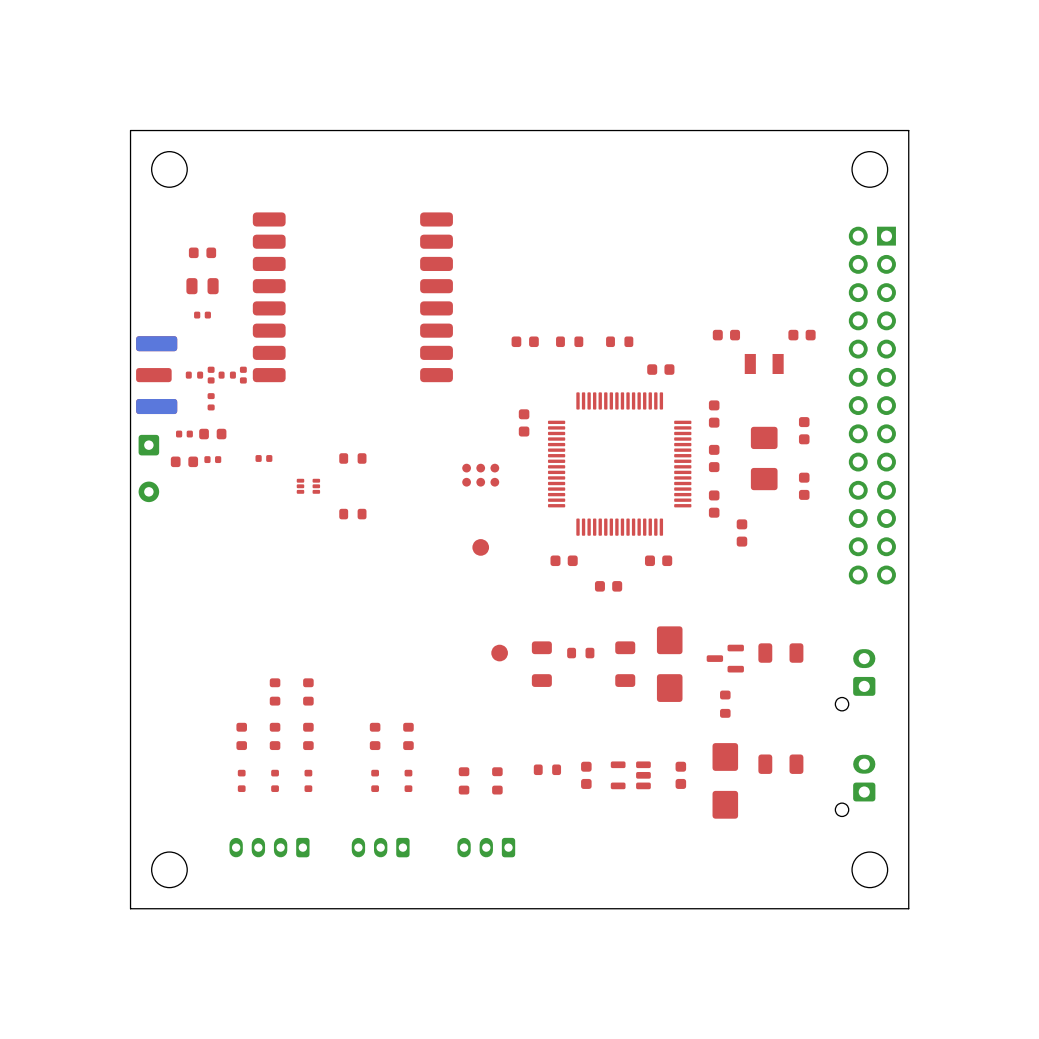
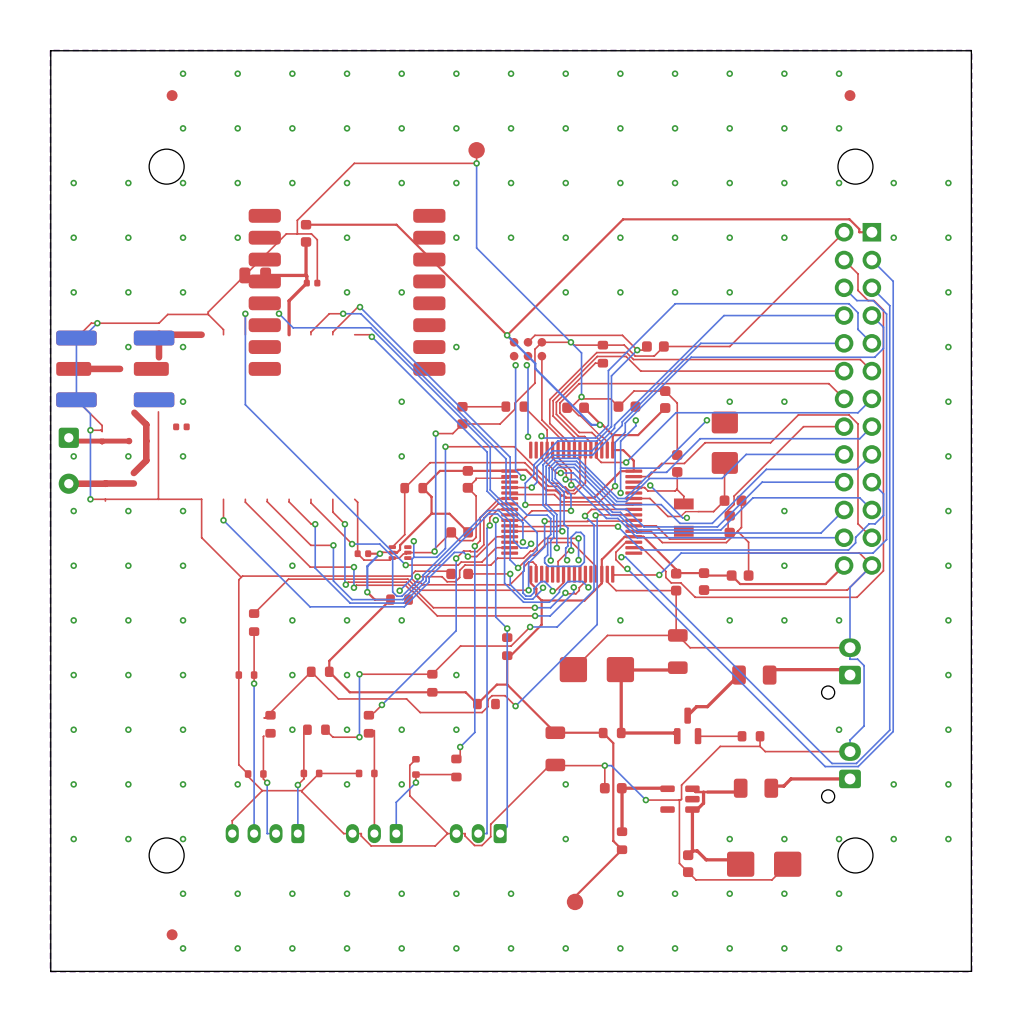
via: none -> (183, 73)
via: none -> (237, 73)
via: none -> (292, 73)
via: none -> (347, 73)
via: none -> (401, 73)
via: none -> (456, 73)
via: none -> (511, 73)
via: none -> (565, 73)
via: none -> (620, 73)
via: none -> (675, 73)
via: none -> (729, 73)
via: none -> (784, 73)
via: none -> (839, 73)
part: none -> (172, 95)
part: none -> (850, 95)
via: none -> (183, 128)
via: none -> (237, 128)
via: none -> (292, 128)
via: none -> (347, 128)
via: none -> (401, 128)
via: none -> (456, 128)
via: none -> (511, 128)
via: none -> (565, 128)
via: none -> (620, 128)
via: none -> (675, 128)
via: none -> (729, 128)
via: none -> (784, 128)
via: none -> (839, 128)
board edge: (908, 130) (130, 130) (130, 908) (908, 908) (908, 130) -> (971, 50) (971, 971) (50, 971) (50, 50) (971, 50)
top track: none -> (476, 150) (476, 163) (354, 163) (297, 220) (297, 233)
part: none -> (476, 150)
bottom track: none -> (476, 163) (476, 247) (581, 352) (581, 396)
via: none -> (476, 163)
via: none -> (73, 183)
via: none -> (128, 183)
via: none -> (183, 183)
via: none -> (237, 183)
via: none -> (292, 183)
via: none -> (347, 183)
via: none -> (401, 183)
via: none -> (456, 183)
via: none -> (511, 183)
via: none -> (565, 183)
via: none -> (620, 183)
via: none -> (675, 183)
via: none -> (729, 183)
via: none -> (784, 183)
via: none -> (839, 183)
via: none -> (893, 183)
via: none -> (948, 183)
top track: none -> (306, 224) (396, 224) (514, 342)
top track: none -> (844, 232) (729, 346) (663, 346) (654, 356) (635, 356) (624, 345) (573, 345) (570, 342) (541, 342) (534, 349) (534, 383) (514, 403) (514, 409) (500, 423) (462, 423) (452, 433) (435, 433)
top track: none -> (871, 232) (859, 232) (859, 229) (849, 219) (623, 219) (507, 335)
via: none -> (73, 237)
via: none -> (128, 237)
via: none -> (183, 237)
via: none -> (237, 237)
via: none -> (347, 237)
via: none -> (456, 237)
via: none -> (511, 237)
via: none -> (565, 237)
via: none -> (620, 237)
via: none -> (675, 237)
via: none -> (729, 237)
via: none -> (784, 237)
via: none -> (893, 237)
via: none -> (948, 237)
top track: none -> (306, 241) (306, 275)
part rotation: 0° (202, 252) -> 90° clockwise (306, 233)
part position: (202, 252) -> (306, 233)
top track: none -> (844, 260) (857, 273) (857, 290) (868, 300) (874, 300) (883, 310) (883, 570) (856, 597) (695, 597) (680, 582) (671, 582) (665, 577) (665, 571) (642, 547) (633, 547)
bottom track: none -> (871, 260) (893, 281) (893, 731) (858, 766) (825, 766) (627, 568)
top track: none -> (306, 275) (306, 283) (289, 300) (289, 334)
top track: none -> (306, 275) (265, 275)
part position: (202, 286) -> (255, 275)
part: none -> (312, 283)
top track: none -> (317, 283) (317, 239) (311, 233) (286, 233) (208, 311) (208, 314)
bottom track: none -> (844, 287) (856, 300) (873, 300) (886, 313) (886, 539) (873, 553) (681, 553) (659, 574)
bottom track: none -> (871, 287) (889, 305) (889, 730) (856, 763) (832, 763) (625, 557) (621, 557)
via: none -> (73, 292)
via: none -> (128, 292)
via: none -> (183, 292)
via: none -> (347, 292)
via: none -> (401, 292)
via: none -> (565, 292)
via: none -> (620, 292)
via: none -> (675, 292)
via: none -> (729, 292)
via: none -> (948, 292)
top track: none -> (360, 307) (332, 332) (332, 334)
bottom track: none -> (360, 307) (510, 457) (510, 498) (527, 515) (547, 515) (550, 518) (550, 534) (547, 537) (547, 555) (544, 558) (544, 562) (548, 566) (580, 566) (584, 562) (584, 535) (580, 532) (576, 532) (571, 537) (571, 550)
via: none -> (360, 307)
part: (202, 315) -> none
bottom track: none -> (279, 313) (293, 327) (370, 327) (490, 447) (490, 490) (522, 522) (522, 542)
via: none -> (279, 313)
top track: none -> (208, 314) (167, 314) (158, 323) (91, 323) (76, 338)
top track: none -> (208, 314) (223, 329) (223, 334)
bottom track: none -> (245, 313) (245, 404) (405, 565)
via: none -> (245, 313)
top track: none -> (343, 313) (329, 313) (310, 332) (310, 334)
bottom track: none -> (343, 313) (360, 313) (506, 458) (506, 501) (537, 532) (537, 549) (524, 563) (523, 593) (526, 596) (530, 596) (534, 592) (534, 588) (541, 581) (544, 581) (552, 591)
via: none -> (343, 313)
bottom track: none -> (844, 315) (724, 315) (614, 425) (614, 428) (591, 450) (552, 450) (536, 466) (536, 482) (531, 487)
bottom track: none -> (871, 315) (883, 327) (883, 348) (874, 357) (691, 357) (625, 423) (625, 432) (615, 442) (615, 486)
bottom track: none -> (97, 323) (82, 338) (76, 338) (76, 399) (90, 413) (90, 499)
via: none -> (97, 323)
part: (726, 335) -> none
part: (802, 335) -> none
top track: none -> (160, 334) (158, 357)
top track: none -> (201, 334) (160, 334)
top track: none -> (354, 334) (369, 334) (371, 336)
bottom track: none -> (507, 335) (535, 363) (535, 368) (591, 424) (599, 424)
via: none -> (507, 335)
part rotation: 0° (525, 341) -> 90° clockwise (462, 415)
part position: (525, 341) -> (462, 415)
part: (569, 341) -> none
part rotation: 0° (619, 341) -> 90° clockwise (602, 354)
part position: (619, 341) -> (602, 354)
bottom track: none -> (371, 336) (487, 452) (487, 491) (513, 517) (513, 541) (520, 548) (526, 548) (531, 543)
via: none -> (371, 336)
top track: none -> (528, 342) (534, 335) (622, 335) (637, 350) (643, 350) (646, 346)
via: none -> (570, 342)
bottom track: none -> (844, 343) (700, 343) (622, 421) (622, 425) (592, 455) (552, 455) (543, 464) (543, 505) (553, 515) (550, 560)
bottom track: none -> (871, 343) (857, 329) (857, 312) (848, 303) (675, 303) (608, 370) (608, 425) (595, 438) (543, 438) (541, 436)
via: none -> (128, 347)
via: none -> (183, 347)
via: none -> (456, 347)
via: none -> (948, 347)
bottom track: none -> (637, 350) (611, 375) (611, 426) (597, 441) (557, 441) (533, 464) (533, 474) (525, 483) (525, 504)
via: none -> (637, 350)
top track: none -> (541, 356) (541, 419) (563, 441) (563, 450)
part rotation: 0° (764, 363) -> 90° clockwise (683, 517)
part position: (764, 363) -> (683, 517)
top track: none -> (602, 363) (595, 363) (556, 402) (556, 414) (578, 436) (584, 436) (590, 442) (590, 450)
part position: (660, 369) -> (655, 346)
bottom track: none -> (515, 365) (515, 470) (522, 477)
via: none -> (515, 365)
bottom track: none -> (526, 365) (528, 436)
via: none -> (526, 365)
part: none -> (76, 368)
top track: none -> (120, 368) (73, 368)
part: (194, 375) -> none
part: (211, 375) -> none
part: (227, 375) -> none
part: (243, 375) -> none
top track: none -> (844, 371) (640, 371) (626, 356) (597, 356) (553, 400) (553, 416) (574, 437) (574, 450)
top track: none -> (871, 371) (860, 359) (633, 359) (626, 352) (596, 352) (549, 399) (549, 423) (569, 442) (569, 450)
part: (211, 401) -> none
via: none -> (581, 396)
top track: none -> (844, 398) (828, 383) (579, 383) (559, 403) (559, 413) (579, 432) (591, 432) (601, 442) (601, 450)
bottom track: none -> (871, 398) (857, 412) (675, 412) (626, 462)
top track: none -> (76, 399) (102, 425) (102, 431) (90, 430)
part: none -> (665, 399)
via: none -> (183, 401)
via: none -> (401, 401)
via: none -> (729, 401)
via: none -> (784, 401)
via: none -> (948, 401)
part footprint: [518, 409, 530, 437] -> [501, 401, 529, 412]
top track: none -> (505, 406) (462, 406)
top track: none -> (523, 406) (547, 429) (547, 450)
part: none -> (626, 406)
top track: none -> (570, 407) (607, 441) (607, 450)
top track: none -> (570, 407) (579, 398) (610, 398) (618, 406) (634, 391) (665, 391) (677, 403) (677, 455)
part: none -> (575, 407)
top track: none -> (584, 407) (612, 435)
top track: none -> (665, 408) (638, 435) (612, 435)
part: (714, 414) -> none
top track: none -> (158, 411) (158, 499)
top track: none -> (134, 412) (146, 424) (146, 460) (133, 473)
bottom track: none -> (635, 420) (635, 426) (620, 441) (620, 492)
via: none -> (635, 420)
bottom track: none -> (706, 420) (659, 468) (620, 468)
via: none -> (706, 420)
part: (804, 430) -> none
via: none -> (599, 424)
top track: none -> (844, 426) (803, 426) (734, 496) (734, 504) (728, 510) (728, 535) (724, 539) (669, 539) (656, 525) (633, 525)
bottom track: none -> (871, 426) (859, 438) (700, 438) (666, 472) (651, 472) (625, 498) (617, 498) (577, 458) (554, 458) (546, 466) (546, 503) (556, 514) (556, 548)
part: (212, 434) -> none
via: none -> (90, 430)
bottom track: none -> (435, 433) (434, 551)
via: none -> (435, 433)
top track: none -> (612, 435) (612, 450) (623, 450) (633, 460) (633, 471) (620, 471) (594, 497) (566, 497) (556, 490) (546, 490) (526, 469) (439, 470) (422, 488) (431, 496) (431, 513)
via: none -> (541, 436)
via: none -> (528, 436)
top track: none -> (68, 437) (68, 441) (129, 441)
top track: none -> (445, 446) (514, 446) (550, 483) (559, 483) (568, 490) (573, 490) (579, 484) (579, 450)
bottom track: none -> (445, 446) (445, 548) (436, 557) (413, 557)
via: none -> (445, 446)
top track: none -> (541, 450) (541, 457) (556, 473) (560, 473)
top track: none -> (552, 450) (552, 458) (566, 470) (565, 479)
top track: none -> (558, 450) (558, 457) (571, 470) (571, 485)
top track: none -> (585, 450) (585, 483) (574, 493) (567, 493) (557, 486) (548, 486) (524, 462) (430, 462) (404, 488) (404, 534) (392, 547)
top track: none -> (596, 450) (596, 457) (601, 462) (626, 462)
part: (263, 458) -> none
part: (352, 458) -> none
part: (714, 458) -> none
part position: (764, 458) -> (724, 442)
part: (212, 459) -> none
part: (184, 461) -> none
bottom track: none -> (844, 454) (746, 454) (722, 478) (649, 478) (626, 501) (616, 501) (576, 461) (555, 461) (549, 467) (549, 481) (560, 492) (560, 529) (562, 531)
bottom track: none -> (871, 454) (856, 469) (766, 469) (712, 523) (679, 523) (661, 504) (615, 504) (575, 464) (557, 464) (552, 469) (552, 480) (564, 492) (564, 524) (567, 528) (567, 546) (565, 548) (567, 560)
via: none -> (73, 456)
via: none -> (128, 456)
via: none -> (183, 456)
via: none -> (401, 456)
part position: (619, 464) -> (571, 512)
via: none -> (948, 456)
part position: (148, 468) -> (68, 460)
via: none -> (626, 462)
top track: none -> (724, 462) (724, 500) (713, 511) (685, 511) (680, 516) (667, 516) (649, 498) (633, 498)
part: none -> (677, 463)
part position: (480, 475) -> (528, 349)
top track: none -> (677, 471) (676, 489)
bottom track: none -> (560, 473) (573, 473) (612, 512) (620, 512) (638, 529) (720, 529) (752, 497) (859, 497) (871, 509)
via: none -> (560, 473)
top track: none -> (509, 476) (508, 478) (476, 478) (467, 487) (476, 496) (476, 537) (472, 540) (459, 540) (451, 532) (434, 548) (433, 552) (407, 552) (399, 558) (392, 558) (390, 560) (364, 560) (357, 553) (357, 502) (354, 499)
top track: none -> (633, 476) (648, 476) (661, 463) (684, 463) (705, 442) (770, 442) (798, 414) (849, 414) (857, 423) (857, 523) (871, 537)
via: none -> (522, 477)
part position: (308, 486) -> (400, 552)
part: (804, 486) -> none
part: none -> (467, 479)
bottom track: none -> (565, 479) (575, 479) (611, 515) (619, 515) (636, 533) (821, 533) (844, 509)
via: none -> (565, 479)
bottom track: none -> (844, 482) (762, 482) (717, 526) (644, 526) (626, 509) (615, 509) (573, 467) (558, 467) (555, 470) (555, 478) (570, 494) (570, 510)
bottom track: none -> (871, 482) (883, 493) (883, 515) (875, 523) (869, 523) (855, 537) (855, 542) (848, 550) (641, 550) (617, 526)
top track: none -> (133, 483) (68, 483)
bottom track: none -> (571, 485) (606, 518) (617, 518) (637, 537) (844, 537)
via: none -> (571, 485)
bottom track: none -> (650, 485) (682, 517) (686, 517)
via: none -> (650, 485)
top track: none -> (615, 486) (599, 501) (561, 501) (554, 494) (509, 493)
via: none -> (615, 486)
top track: none -> (531, 487) (509, 487)
via: none -> (531, 487)
top track: none -> (633, 487) (644, 487) (647, 490) (675, 490) (676, 489)
part: none -> (413, 488)
top track: none -> (676, 489) (683, 496) (683, 503)
via: none -> (620, 492)
part: (714, 504) -> none
top track: none -> (509, 498) (499, 498) (480, 517) (480, 540) (474, 546)
top track: none -> (90, 499) (201, 499) (201, 537) (241, 577)
via: none -> (90, 499)
top track: none -> (105, 499) (105, 501)
top track: none -> (223, 499) (223, 520)
top track: none -> (245, 499) (245, 502) (310, 567) (353, 567)
top track: none -> (267, 499) (267, 501) (310, 545) (333, 545)
top track: none -> (289, 499) (289, 501) (311, 524) (315, 524)
top track: none -> (310, 499) (310, 502) (352, 544)
top track: none -> (332, 499) (332, 512) (344, 524)
part: none -> (733, 500)
top track: none -> (741, 500) (741, 527) (726, 542) (662, 542) (651, 531) (633, 531)
top track: none -> (509, 503) (498, 503) (483, 518) (483, 544) (477, 551) (463, 551) (456, 558)
top track: none -> (633, 503) (525, 504)
via: none -> (525, 504)
part: (352, 514) -> none
top track: none -> (509, 509) (497, 509) (489, 517) (489, 525)
top track: none -> (633, 509) (591, 509) (584, 515)
via: none -> (73, 511)
via: none -> (128, 511)
via: none -> (183, 511)
top track: none -> (570, 510) (531, 510) (522, 520) (509, 520)
via: none -> (570, 510)
via: none -> (784, 511)
via: none -> (948, 511)
top track: none -> (431, 513) (449, 513) (468, 532)
top track: none -> (431, 513) (400, 545) (400, 549) (397, 552) (368, 553)
top track: none -> (633, 514) (595, 515)
bottom track: none -> (584, 515) (594, 524) (594, 590) (557, 626) (530, 626)
via: none -> (584, 515)
bottom track: none -> (595, 515) (597, 516) (597, 624) (515, 706)
via: none -> (595, 515)
via: none -> (686, 517)
bottom track: none -> (495, 520) (495, 617) (507, 628) (507, 826) (500, 833)
via: none -> (495, 520)
bottom track: none -> (223, 520) (310, 606) (404, 606) (454, 552) (463, 552) (467, 556)
via: none -> (223, 520)
bottom track: none -> (544, 521) (544, 546) (528, 562) (528, 590)
via: none -> (544, 521)
top track: none -> (633, 520) (544, 521)
bottom track: none -> (344, 524) (345, 584)
via: none -> (344, 524)
bottom track: none -> (315, 524) (315, 568) (350, 603) (403, 603) (426, 580) (426, 576) (488, 514) (497, 514) (504, 520) (504, 583) (523, 602) (549, 602) (567, 581) (582, 581) (588, 587)
via: none -> (315, 524)
bottom track: none -> (489, 525) (487, 528) (487, 833) (478, 833)
via: none -> (489, 525)
top track: none -> (509, 525) (617, 526)
via: none -> (617, 526)
top track: none -> (562, 531) (509, 531)
via: none -> (562, 531)
top track: none -> (737, 531) (748, 542) (748, 575)
part: none -> (459, 532)
top track: none -> (509, 536) (496, 536) (476, 556) (467, 556)
part: (480, 547) -> none
top track: none -> (578, 538) (545, 538) (523, 558) (497, 558) (490, 565) (465, 565) (459, 570) (459, 577) (455, 581) (447, 581) (442, 576) (417, 576)
bottom track: none -> (578, 538) (578, 560)
via: none -> (578, 538)
bottom track: none -> (413, 541) (413, 557)
via: none -> (413, 541)
via: none -> (522, 542)
top track: none -> (633, 542) (625, 542) (615, 552) (615, 559) (627, 568)
via: none -> (531, 543)
bottom track: none -> (352, 544) (379, 544) (392, 556) (392, 592) (396, 596) (401, 596) (417, 580) (417, 576)
via: none -> (352, 544)
bottom track: none -> (333, 545) (333, 580) (352, 599) (402, 599) (423, 579) (423, 575) (487, 510) (498, 510) (510, 521) (510, 560) (518, 567)
via: none -> (333, 545)
bottom track: none -> (474, 546) (474, 732) (460, 747)
via: none -> (474, 546)
top track: none -> (509, 547) (496, 547) (481, 562) (461, 562) (458, 565) (405, 565)
via: none -> (556, 548)
top track: none -> (571, 550) (558, 561) (558, 574)
via: none -> (571, 550)
via: none -> (434, 551)
part: (564, 560) -> none
part: (658, 560) -> none
part: none -> (362, 553)
top track: none -> (748, 553) (859, 553) (871, 565) (847, 590) (704, 590)
bottom track: none -> (379, 553) (367, 566) (367, 592)
via: none -> (379, 553)
via: none -> (467, 556)
bottom track: none -> (413, 557) (412, 559) (412, 578) (399, 590)
via: none -> (621, 557)
bottom track: none -> (456, 558) (456, 630) (381, 704)
via: none -> (456, 558)
via: none -> (550, 560)
via: none -> (567, 560)
via: none -> (578, 560)
via: none -> (405, 565)
top track: none -> (844, 565) (825, 584) (740, 584) (731, 575) (676, 573)
bottom track: none -> (871, 565) (850, 587) (850, 659) (857, 659) (864, 665) (864, 726) (850, 740) (850, 751)
via: none -> (73, 565)
via: none -> (128, 565)
via: none -> (183, 565)
via: none -> (292, 565)
via: none -> (784, 565)
via: none -> (948, 565)
bottom track: none -> (353, 567) (353, 587)
via: none -> (353, 567)
top track: none -> (518, 567) (547, 542) (572, 542) (596, 566) (596, 574)
via: none -> (518, 567)
via: none -> (627, 568)
top track: none -> (451, 573) (448, 571) (415, 571) (412, 574) (412, 579) (422, 584) (509, 584) (524, 570) (524, 566) (528, 562) (533, 562) (536, 565) (536, 574)
part: none -> (459, 573)
top track: none -> (510, 573) (468, 573)
bottom track: none -> (510, 573) (510, 584) (524, 599) (532, 599) (543, 587)
via: none -> (510, 573)
top track: none -> (530, 574) (530, 583) (536, 588) (536, 595) (541, 600)
top track: none -> (563, 574) (563, 582) (552, 591)
top track: none -> (585, 574) (585, 581) (575, 593) (565, 592)
top track: none -> (607, 574) (607, 581) (616, 590) (676, 590) (676, 635)
top track: none -> (612, 574) (659, 574)
top track: none -> (676, 573) (676, 569) (643, 536) (624, 536) (601, 559) (601, 583) (584, 600) (541, 600)
via: none -> (659, 574)
top track: none -> (412, 576) (242, 576) (238, 579) (238, 764) (262, 790)
part: none -> (740, 575)
via: none -> (417, 576)
part: (608, 586) -> none
part: none -> (676, 582)
part: none -> (704, 581)
top track: none -> (345, 584) (348, 582) (406, 582) (433, 607) (534, 607)
via: none -> (345, 584)
top track: none -> (353, 587) (356, 585) (405, 585) (437, 615) (535, 615)
via: none -> (353, 587)
via: none -> (543, 587)
bottom track: none -> (573, 587) (573, 592) (550, 615) (535, 615)
via: none -> (573, 587)
via: none -> (588, 587)
via: none -> (399, 590)
top track: none -> (528, 590) (420, 590) (407, 579) (288, 579) (254, 613)
via: none -> (528, 590)
via: none -> (552, 591)
top track: none -> (367, 592) (374, 599) (390, 599) (329, 660) (329, 671) (349, 692) (465, 692) (477, 704) (496, 684) (507, 684)
via: none -> (367, 592)
bottom track: none -> (565, 592) (550, 607) (534, 607)
via: none -> (565, 592)
part: none -> (399, 599)
top track: none -> (541, 600) (541, 624) (510, 655) (507, 655) (507, 684)
via: none -> (534, 607)
via: none -> (535, 615)
via: none -> (73, 620)
via: none -> (128, 620)
via: none -> (183, 620)
via: none -> (292, 620)
via: none -> (347, 620)
via: none -> (401, 620)
via: none -> (620, 620)
via: none -> (729, 620)
via: none -> (784, 620)
via: none -> (839, 620)
via: none -> (948, 620)
part: none -> (254, 622)
top track: none -> (530, 626) (511, 646) (460, 646) (432, 674) (359, 674)
via: none -> (530, 626)
via: none -> (507, 628)
top track: none -> (254, 631) (254, 683)
part: (499, 653) -> none
part: (580, 653) -> none
part position: (780, 653) -> (754, 675)
part: none -> (507, 646)
part rotation: 0° (725, 658) -> 90° clockwise (687, 725)
part position: (725, 658) -> (687, 725)
top track: none -> (850, 647) (690, 647) (677, 635) (607, 635) (573, 669)
part: none -> (677, 651)
part: (541, 664) -> none
part: (625, 664) -> none
part rotation: 0° (669, 664) -> 90° clockwise (596, 669)
part position: (669, 664) -> (596, 669)
top track: none -> (677, 667) (675, 670) (620, 669)
top track: none -> (621, 670) (621, 733) (674, 733) (677, 736)
bottom track: none -> (359, 674) (359, 737)
via: none -> (359, 674)
via: none -> (73, 675)
via: none -> (128, 675)
via: none -> (183, 675)
part: none -> (246, 675)
via: none -> (292, 675)
via: none -> (347, 675)
via: none -> (456, 675)
top track: none -> (739, 675) (707, 706) (696, 706) (687, 715)
top track: none -> (850, 675) (844, 669) (775, 669) (769, 675)
via: none -> (948, 675)
part: (275, 691) -> none
part rotation: 0° (308, 691) -> 90° clockwise (320, 671)
part position: (308, 691) -> (320, 671)
part: none -> (432, 683)
bottom track: none -> (254, 683) (254, 833)
via: none -> (254, 683)
top track: none -> (507, 684) (555, 732) (602, 732) (613, 743) (613, 840) (622, 849) (575, 896) (575, 901)
part: (725, 704) -> none
part: none -> (486, 704)
top track: none -> (381, 704) (374, 712)
via: none -> (381, 704)
top track: none -> (515, 706) (505, 695) (492, 695) (487, 699) (487, 706) (482, 712) (420, 712) (406, 698) (338, 698) (311, 671) (263, 717)
via: none -> (515, 706)
part: (241, 736) -> none
part rotation: 0° (308, 736) -> 90° clockwise (316, 729)
part: (408, 736) -> none
via: none -> (73, 729)
via: none -> (128, 729)
via: none -> (183, 729)
via: none -> (292, 729)
top track: none -> (307, 729) (303, 733) (303, 778) (297, 784)
top track: none -> (325, 729) (332, 737) (359, 737)
via: none -> (347, 729)
via: none -> (401, 729)
via: none -> (456, 729)
via: none -> (839, 729)
via: none -> (948, 729)
top track: none -> (374, 730) (374, 833)
part: none -> (612, 733)
top track: none -> (263, 736) (263, 778) (267, 782)
top track: none -> (742, 736) (698, 736)
part: none -> (751, 736)
top track: none -> (760, 736) (760, 746)
via: none -> (359, 737)
top track: none -> (760, 746) (720, 746) (681, 785) (680, 800) (645, 800)
top track: none -> (760, 746) (765, 751) (850, 751)
top track: none -> (460, 747) (460, 756)
via: none -> (460, 747)
part: none -> (555, 748)
part position: (780, 764) -> (755, 788)
part: (547, 769) -> none
top track: none -> (415, 759) (409, 765) (409, 795) (447, 833)
part: (586, 775) -> none
part position: (630, 775) -> (679, 799)
part: (680, 775) -> none
bottom track: none -> (604, 765) (611, 765) (645, 800)
via: none -> (604, 765)
part: (241, 780) -> none
part: (275, 780) -> none
part rotation: 0° (308, 780) -> 90° clockwise (311, 773)
part rotation: 0° (375, 780) -> 90° clockwise (366, 773)
part position: (408, 780) -> (415, 766)
part: (497, 780) -> none
part: (725, 780) -> none
top track: none -> (359, 773) (319, 773) (301, 790)
part: none -> (255, 774)
top track: none -> (460, 774) (415, 774) (415, 782)
top track: none -> (850, 778) (790, 778) (783, 786) (773, 786) (771, 788)
bottom track: none -> (267, 782) (267, 833) (275, 833)
via: none -> (267, 782)
bottom track: none -> (415, 782) (396, 802) (396, 833)
via: none -> (415, 782)
via: none -> (73, 784)
via: none -> (128, 784)
via: none -> (183, 784)
via: none -> (237, 784)
via: none -> (347, 784)
via: none -> (401, 784)
via: none -> (565, 784)
via: none -> (893, 784)
via: none -> (948, 784)
bottom track: none -> (297, 784) (297, 833)
via: none -> (297, 784)
top track: none -> (604, 788) (604, 765) (550, 764) (490, 824) (490, 836) (481, 845) (474, 845) (465, 836) (465, 833) (447, 833)
part: none -> (613, 788)
top track: none -> (740, 788) (736, 792) (695, 792) (692, 788)
top track: none -> (667, 788) (621, 788) (622, 831)
top track: none -> (262, 790) (232, 820) (232, 833)
top track: none -> (301, 790) (343, 833) (361, 833) (361, 836) (371, 845) (435, 845) (447, 833)
top track: none -> (301, 790) (262, 790)
top track: none -> (703, 792) (703, 803) (697, 809) (692, 809) (692, 850)
via: none -> (645, 800)
top track: none -> (679, 800) (679, 863) (695, 879) (772, 879) (787, 864)
via: none -> (73, 839)
via: none -> (128, 839)
via: none -> (183, 839)
via: none -> (565, 839)
via: none -> (729, 839)
via: none -> (784, 839)
via: none -> (839, 839)
via: none -> (893, 839)
via: none -> (948, 839)
part: none -> (622, 840)
top track: none -> (692, 850) (697, 850) (706, 859) (736, 859) (740, 864)
part: none -> (688, 863)
part: none -> (764, 864)
via: none -> (183, 893)
via: none -> (237, 893)
via: none -> (292, 893)
via: none -> (347, 893)
via: none -> (401, 893)
via: none -> (456, 893)
via: none -> (511, 893)
via: none -> (620, 893)
via: none -> (675, 893)
via: none -> (729, 893)
via: none -> (784, 893)
via: none -> (839, 893)
part: none -> (575, 901)
part: none -> (172, 934)
via: none -> (183, 948)
via: none -> (237, 948)
via: none -> (292, 948)
via: none -> (347, 948)
via: none -> (401, 948)
via: none -> (456, 948)
via: none -> (511, 948)
via: none -> (565, 948)
via: none -> (620, 948)
via: none -> (675, 948)
via: none -> (729, 948)
via: none -> (784, 948)
via: none -> (839, 948)

